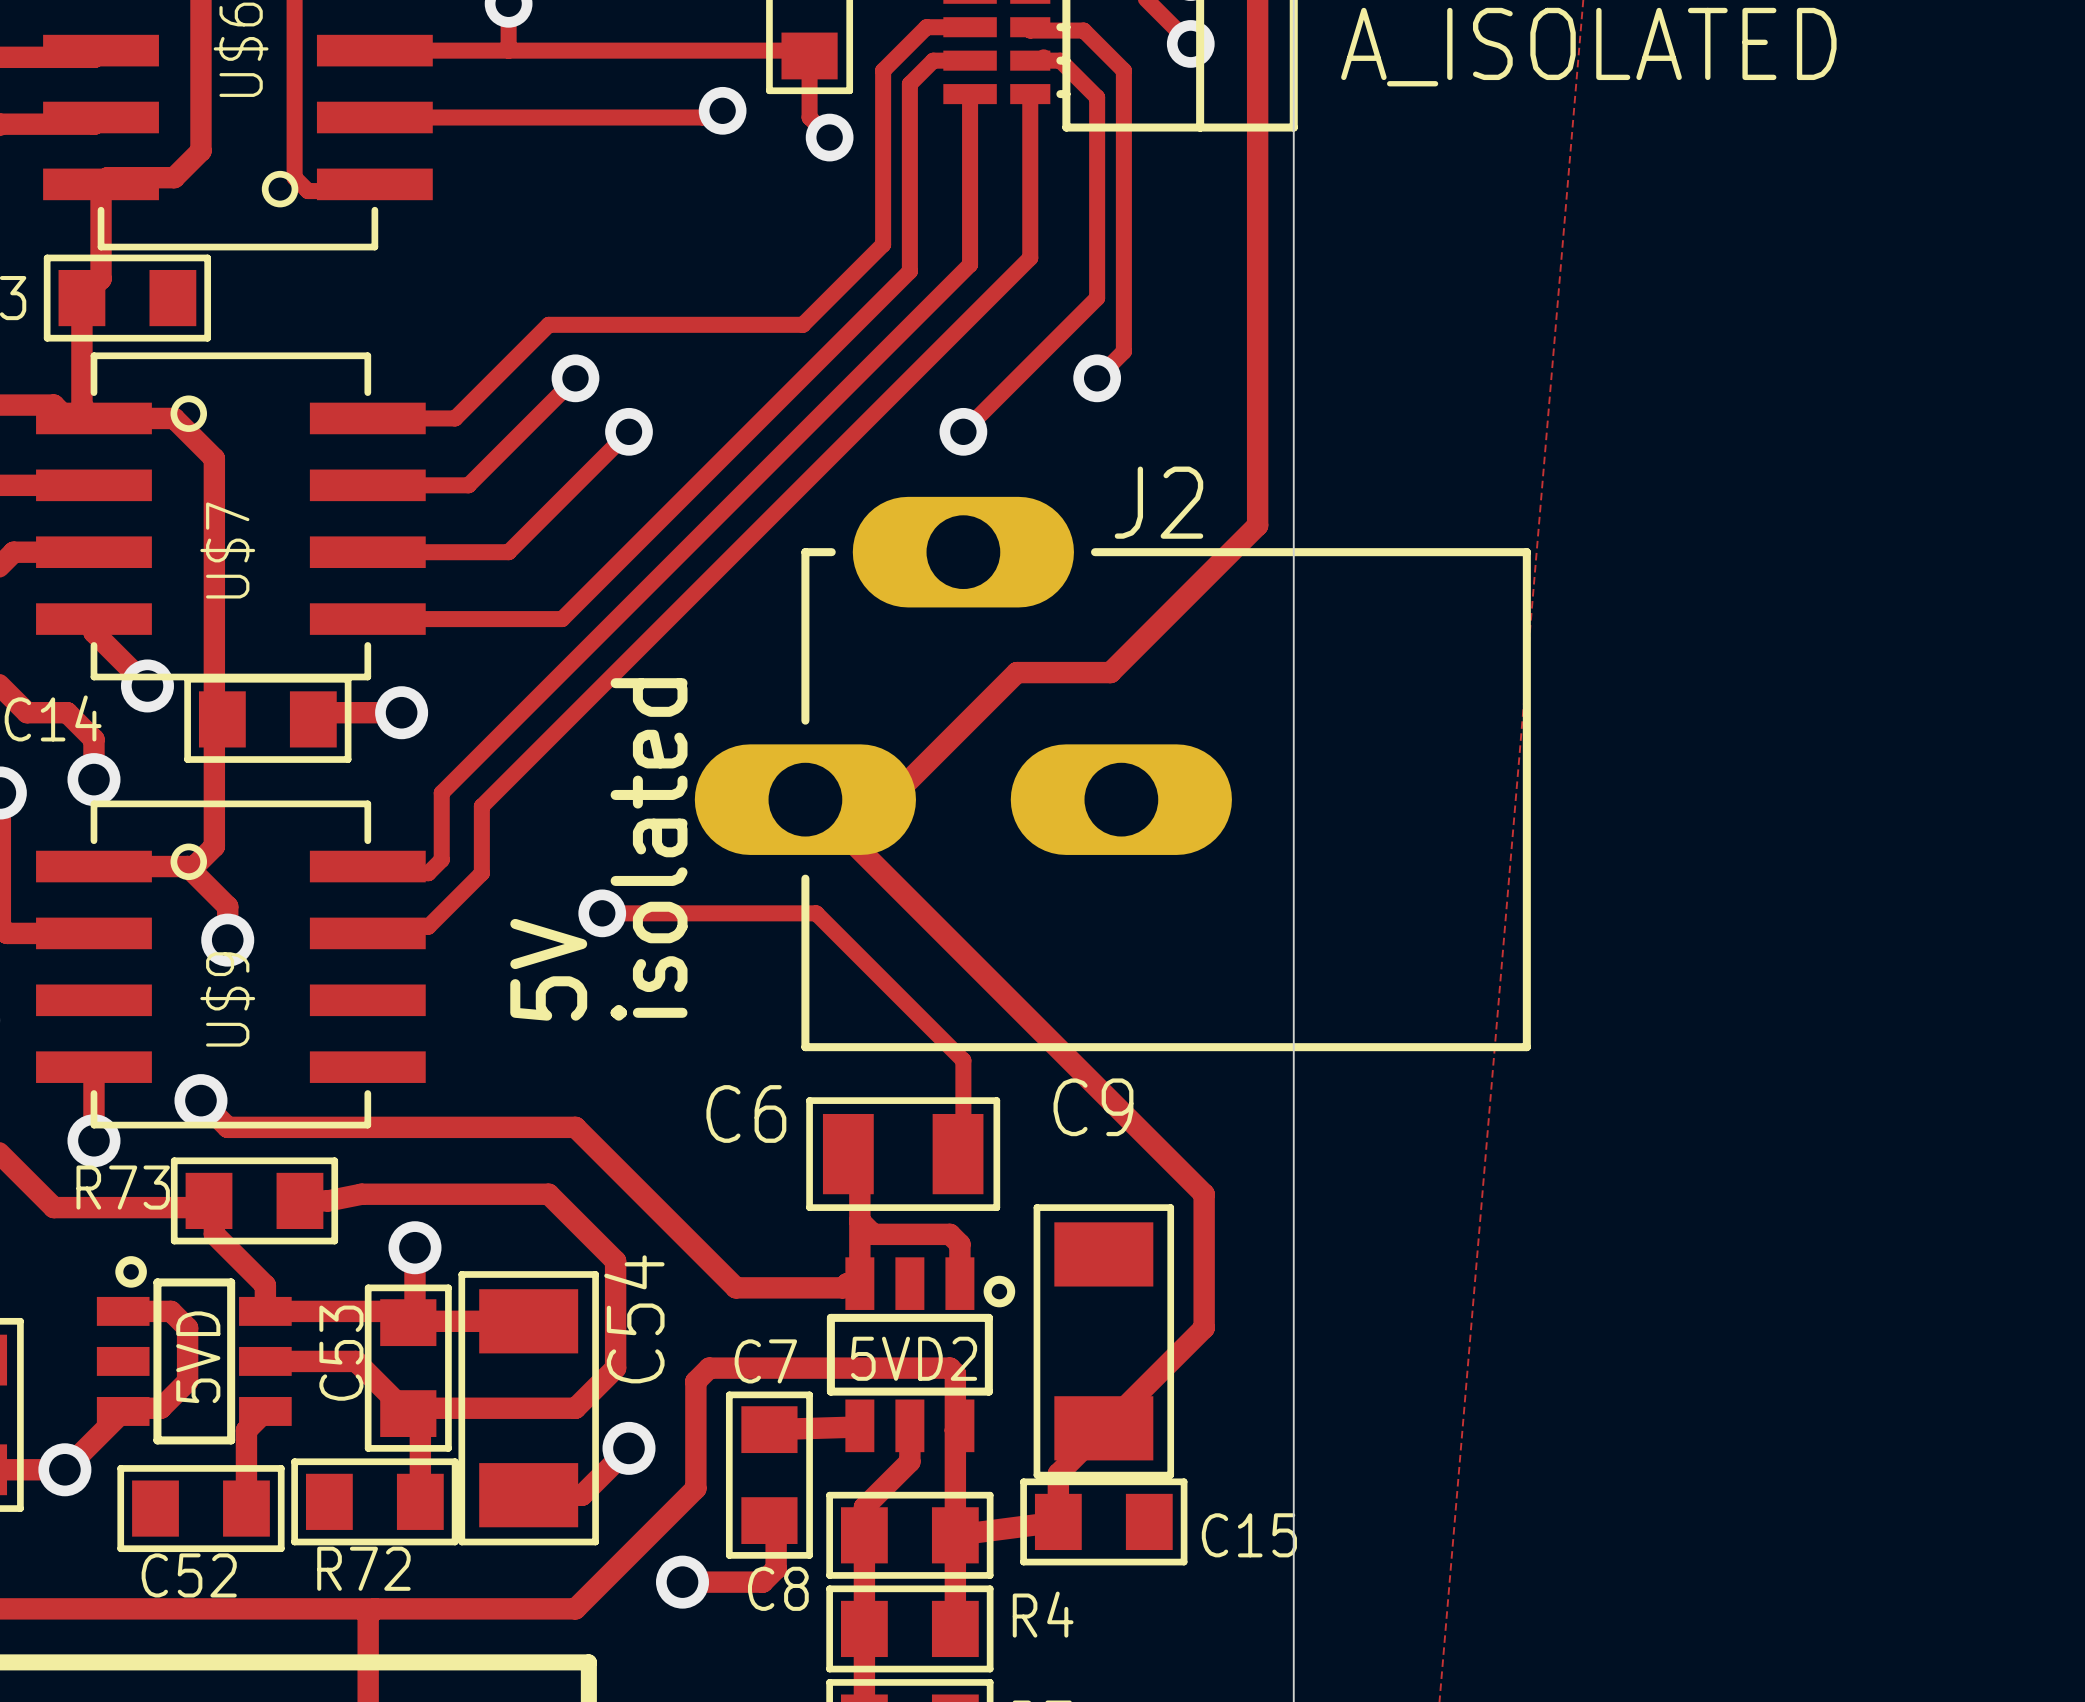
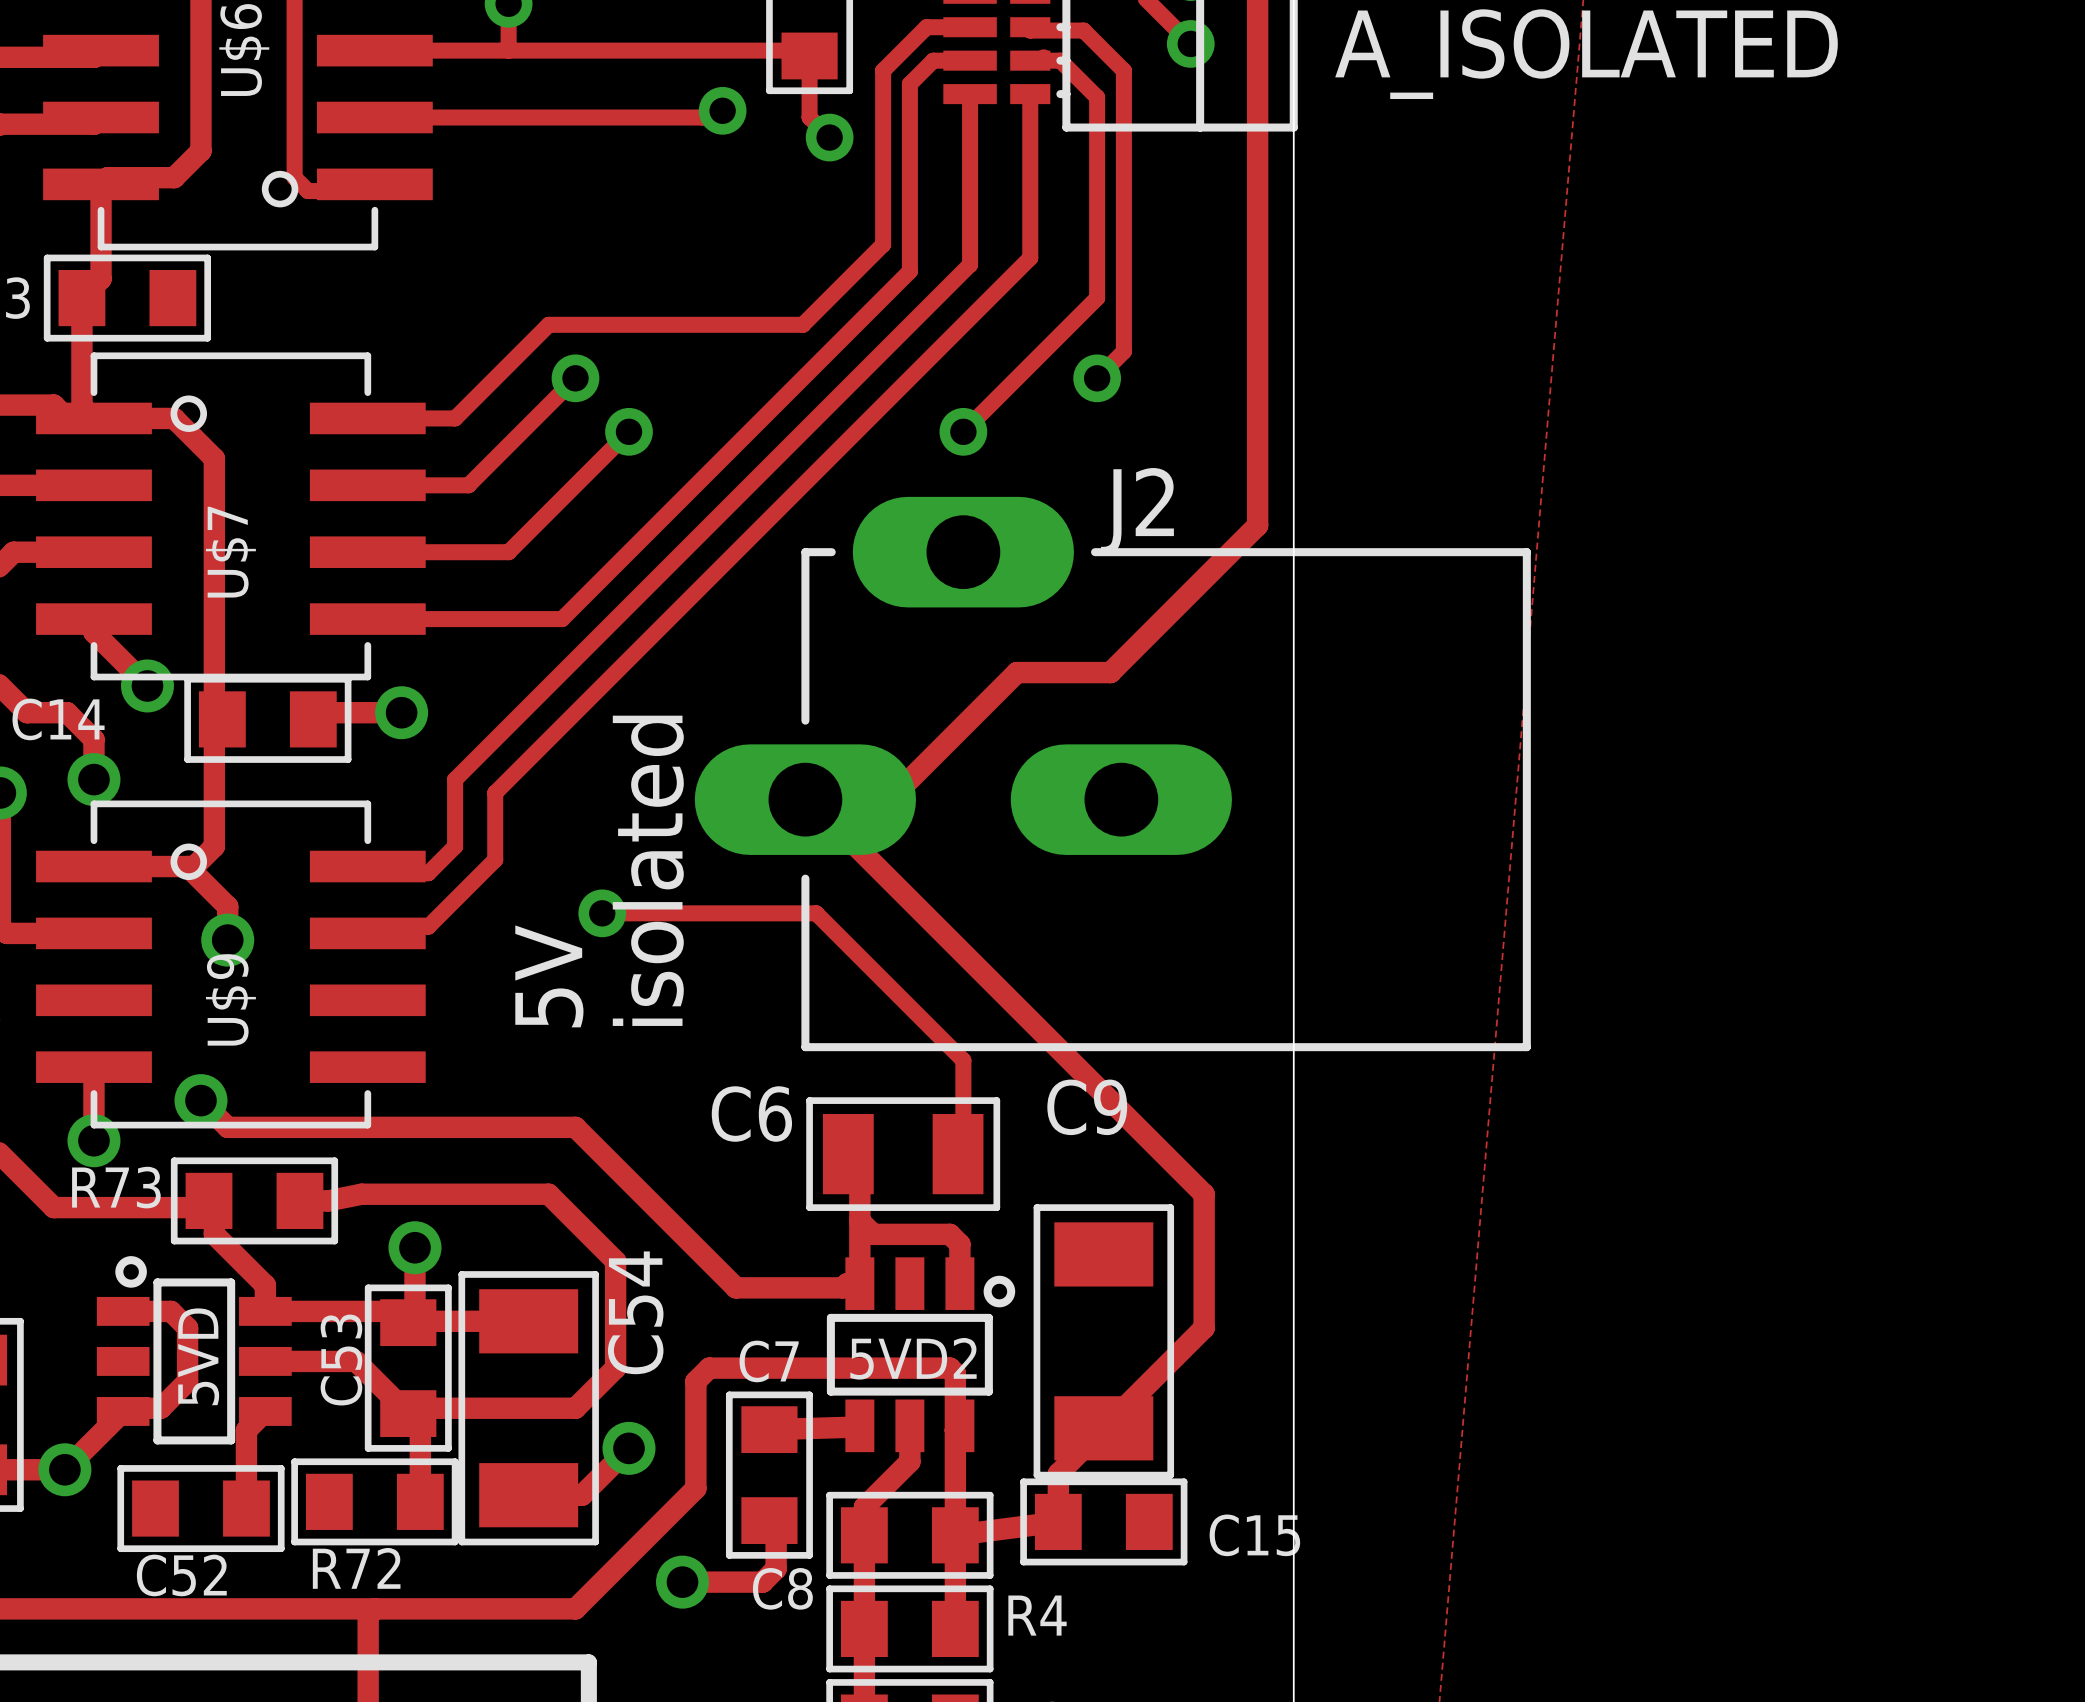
track: (455, 779) (441, 792) (441, 859) -> (455, 779) (455, 846) (441, 859)
track: (495, 792) (481, 806) (481, 873) -> (495, 792) (495, 859) (481, 873)

